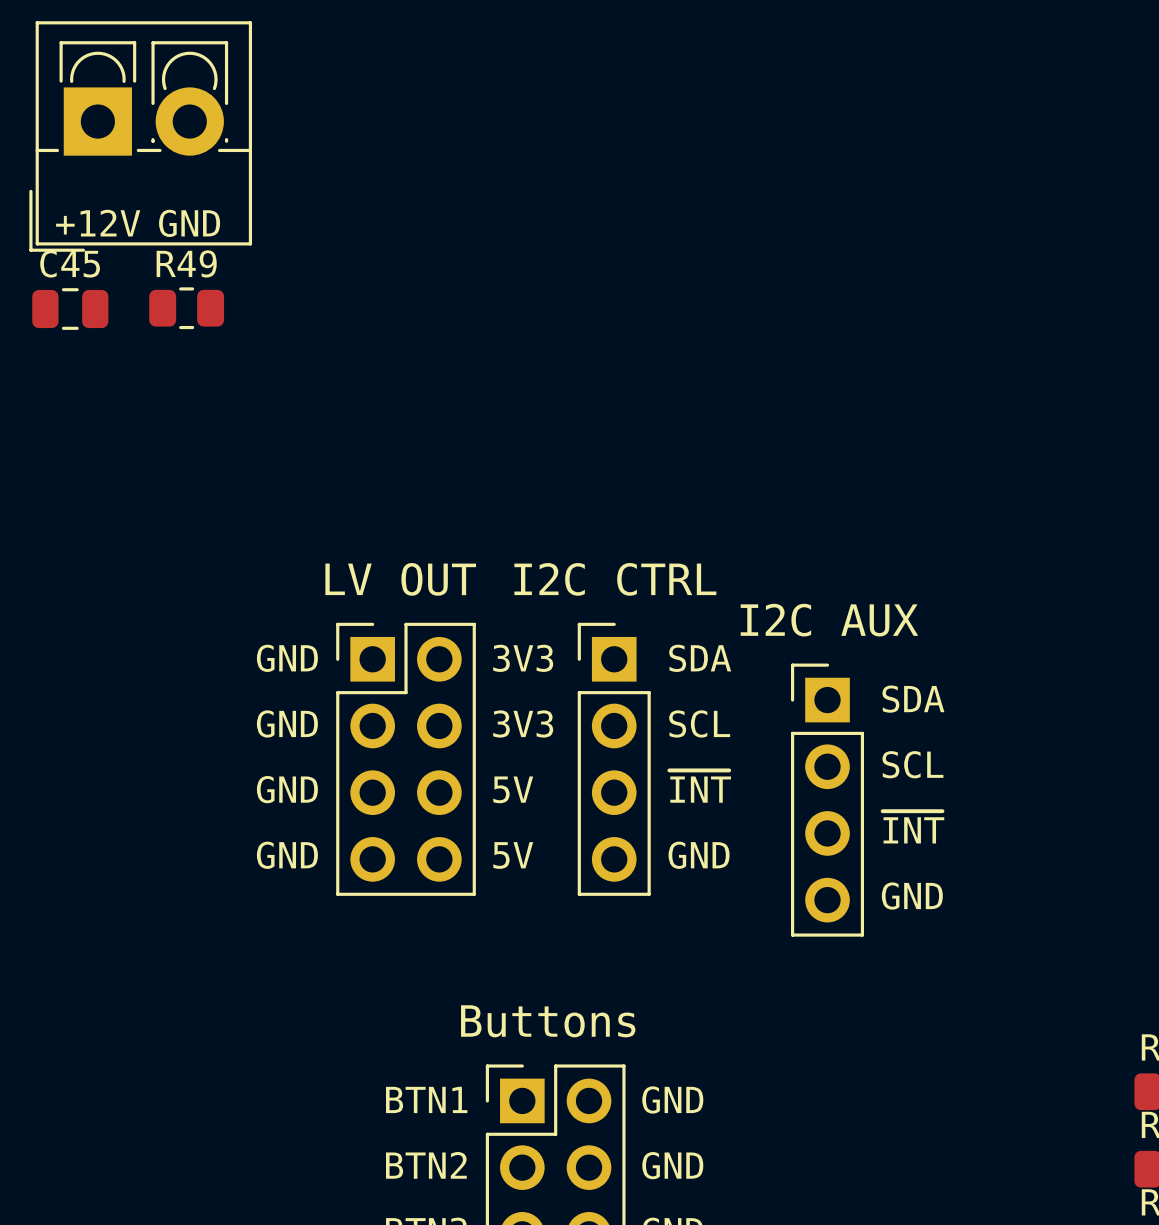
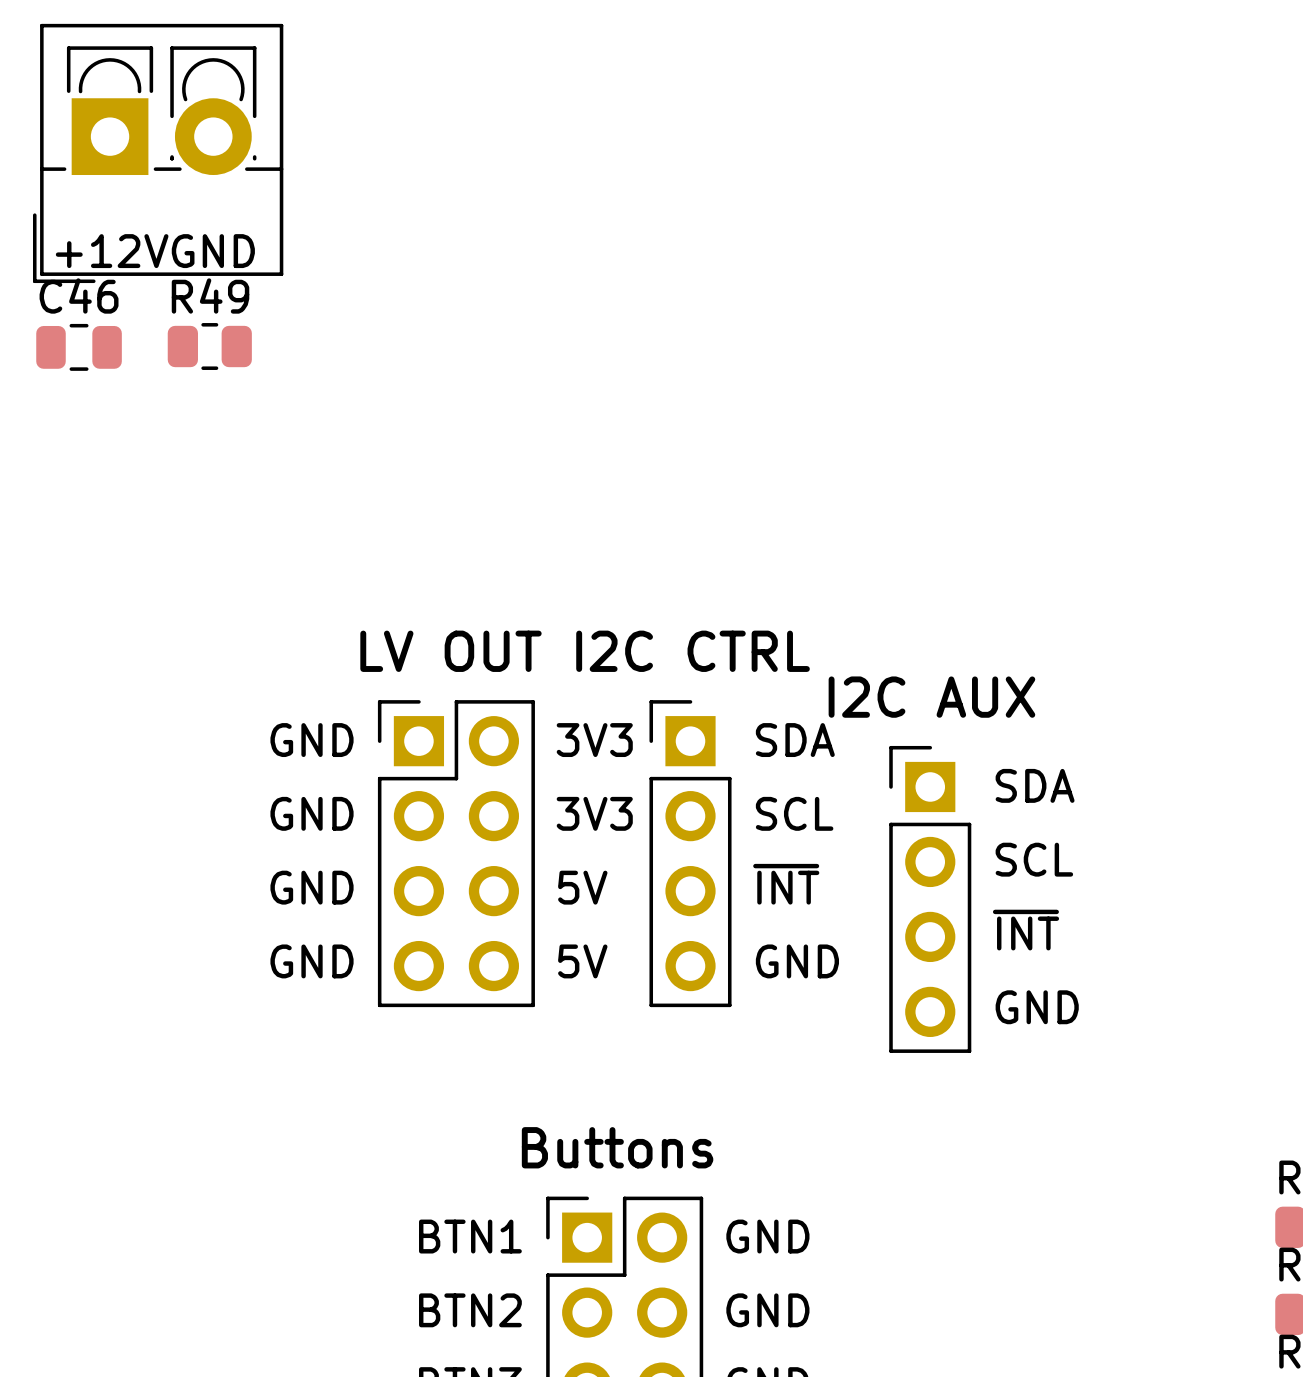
C45 name: C45 (70, 263) -> C46 (79, 295)

